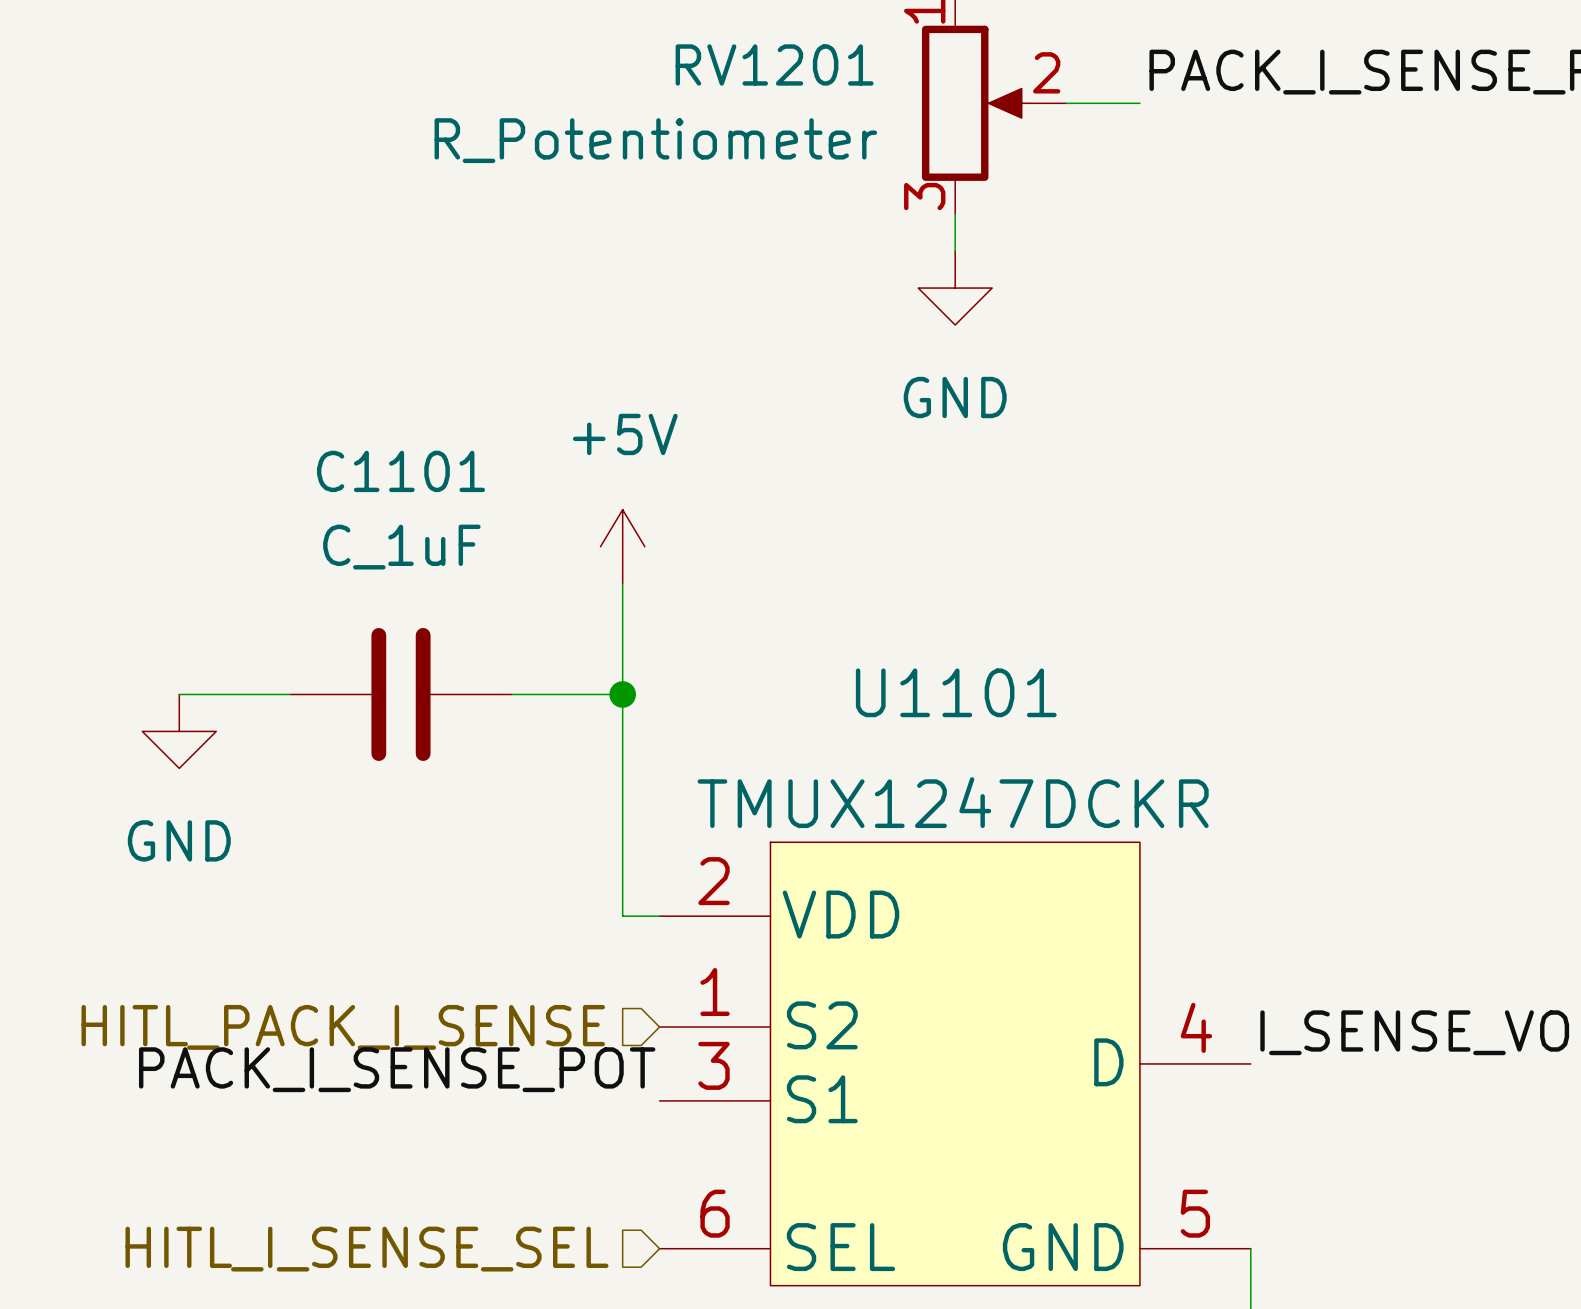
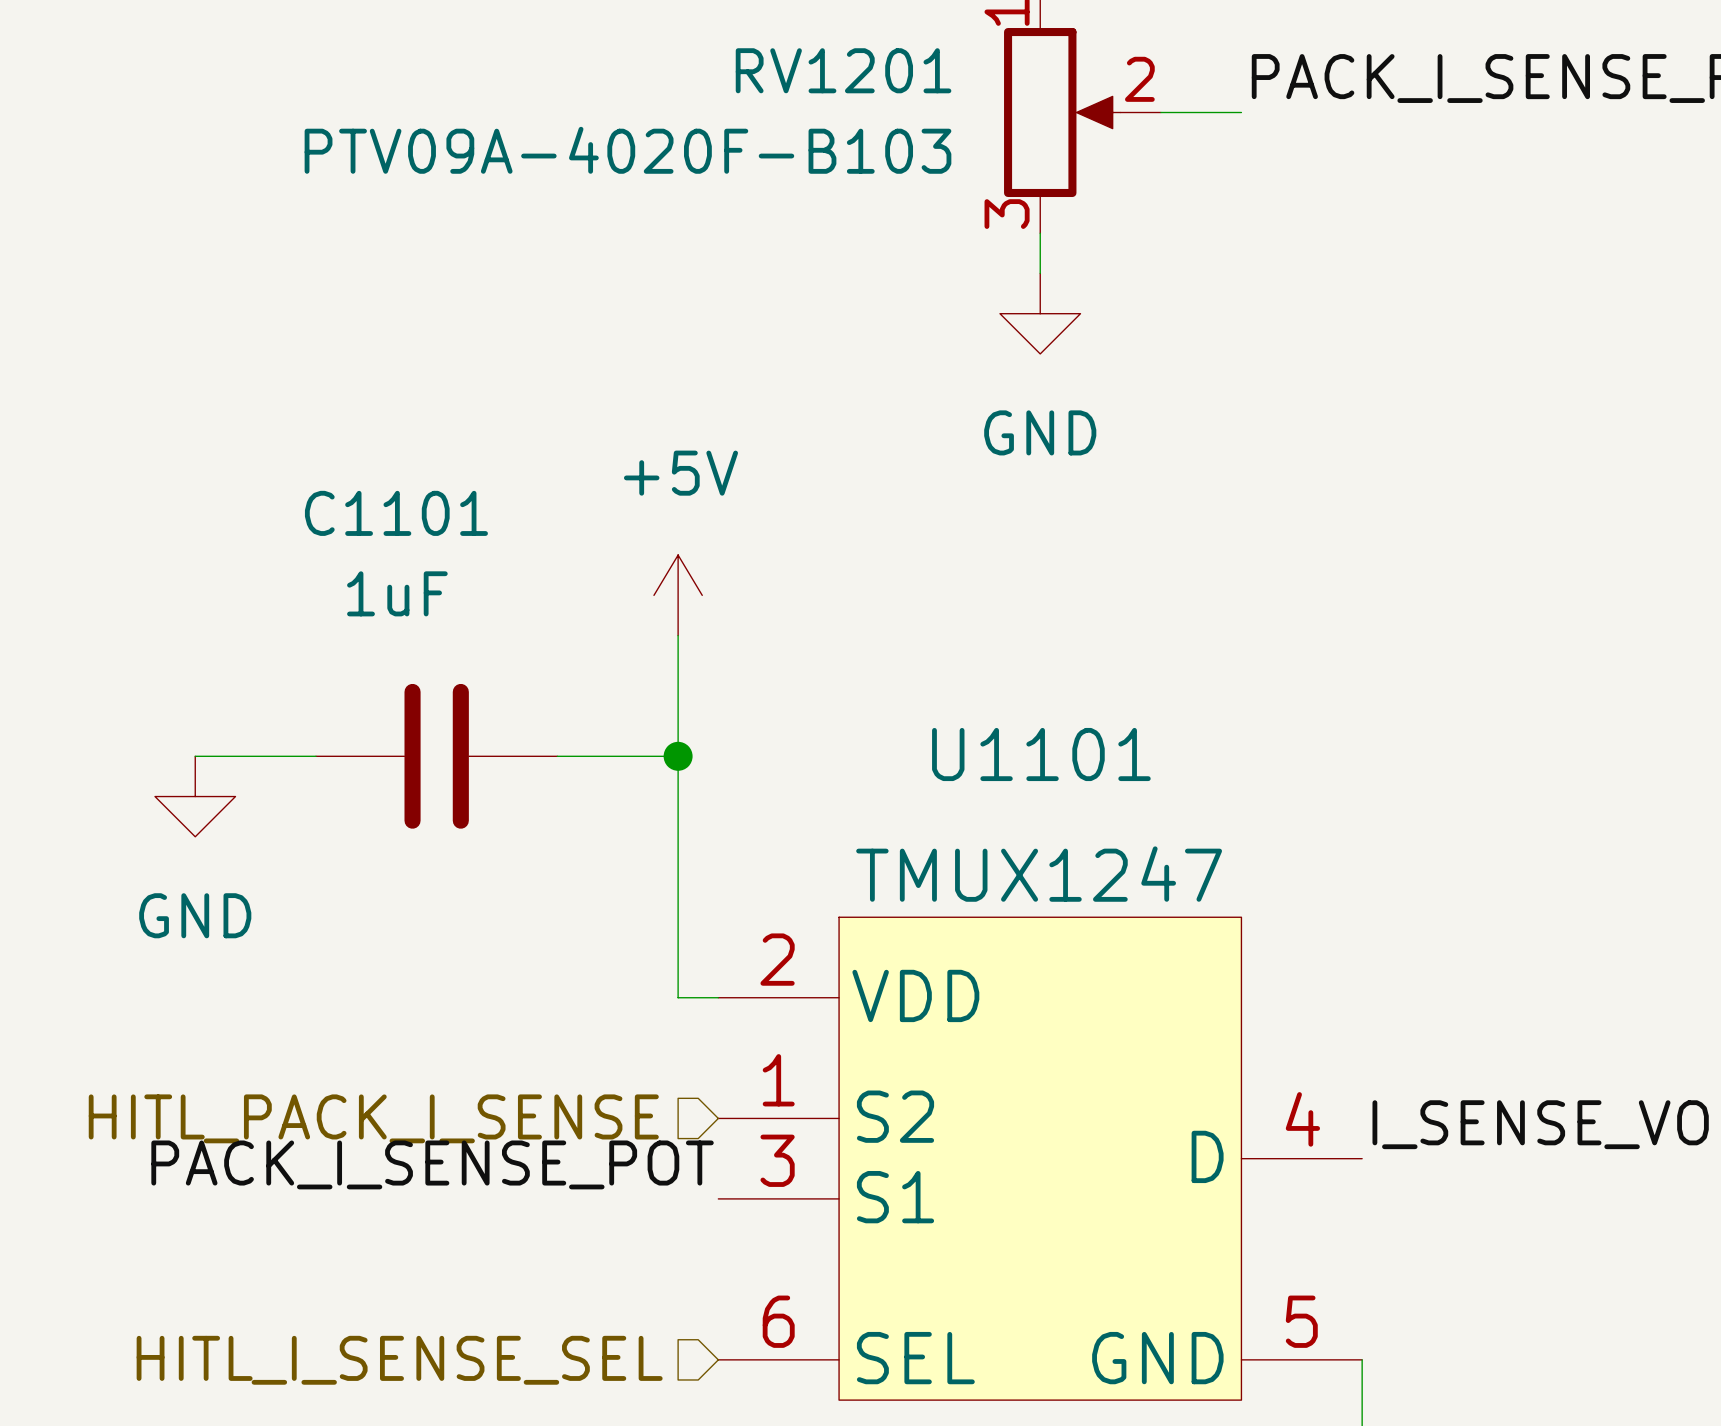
RV1201 value: R_Potentiometer (655, 140) -> PTV09A-4020F-B103 (627, 150)
C1101 name position: C1101 (400, 471) -> C1101 (396, 513)
C1101 value: C_1uF (401, 547) -> 1uF (397, 593)
U1101 value: TMUX1247DCKR (953, 802) -> TMUX1247 (1039, 874)

